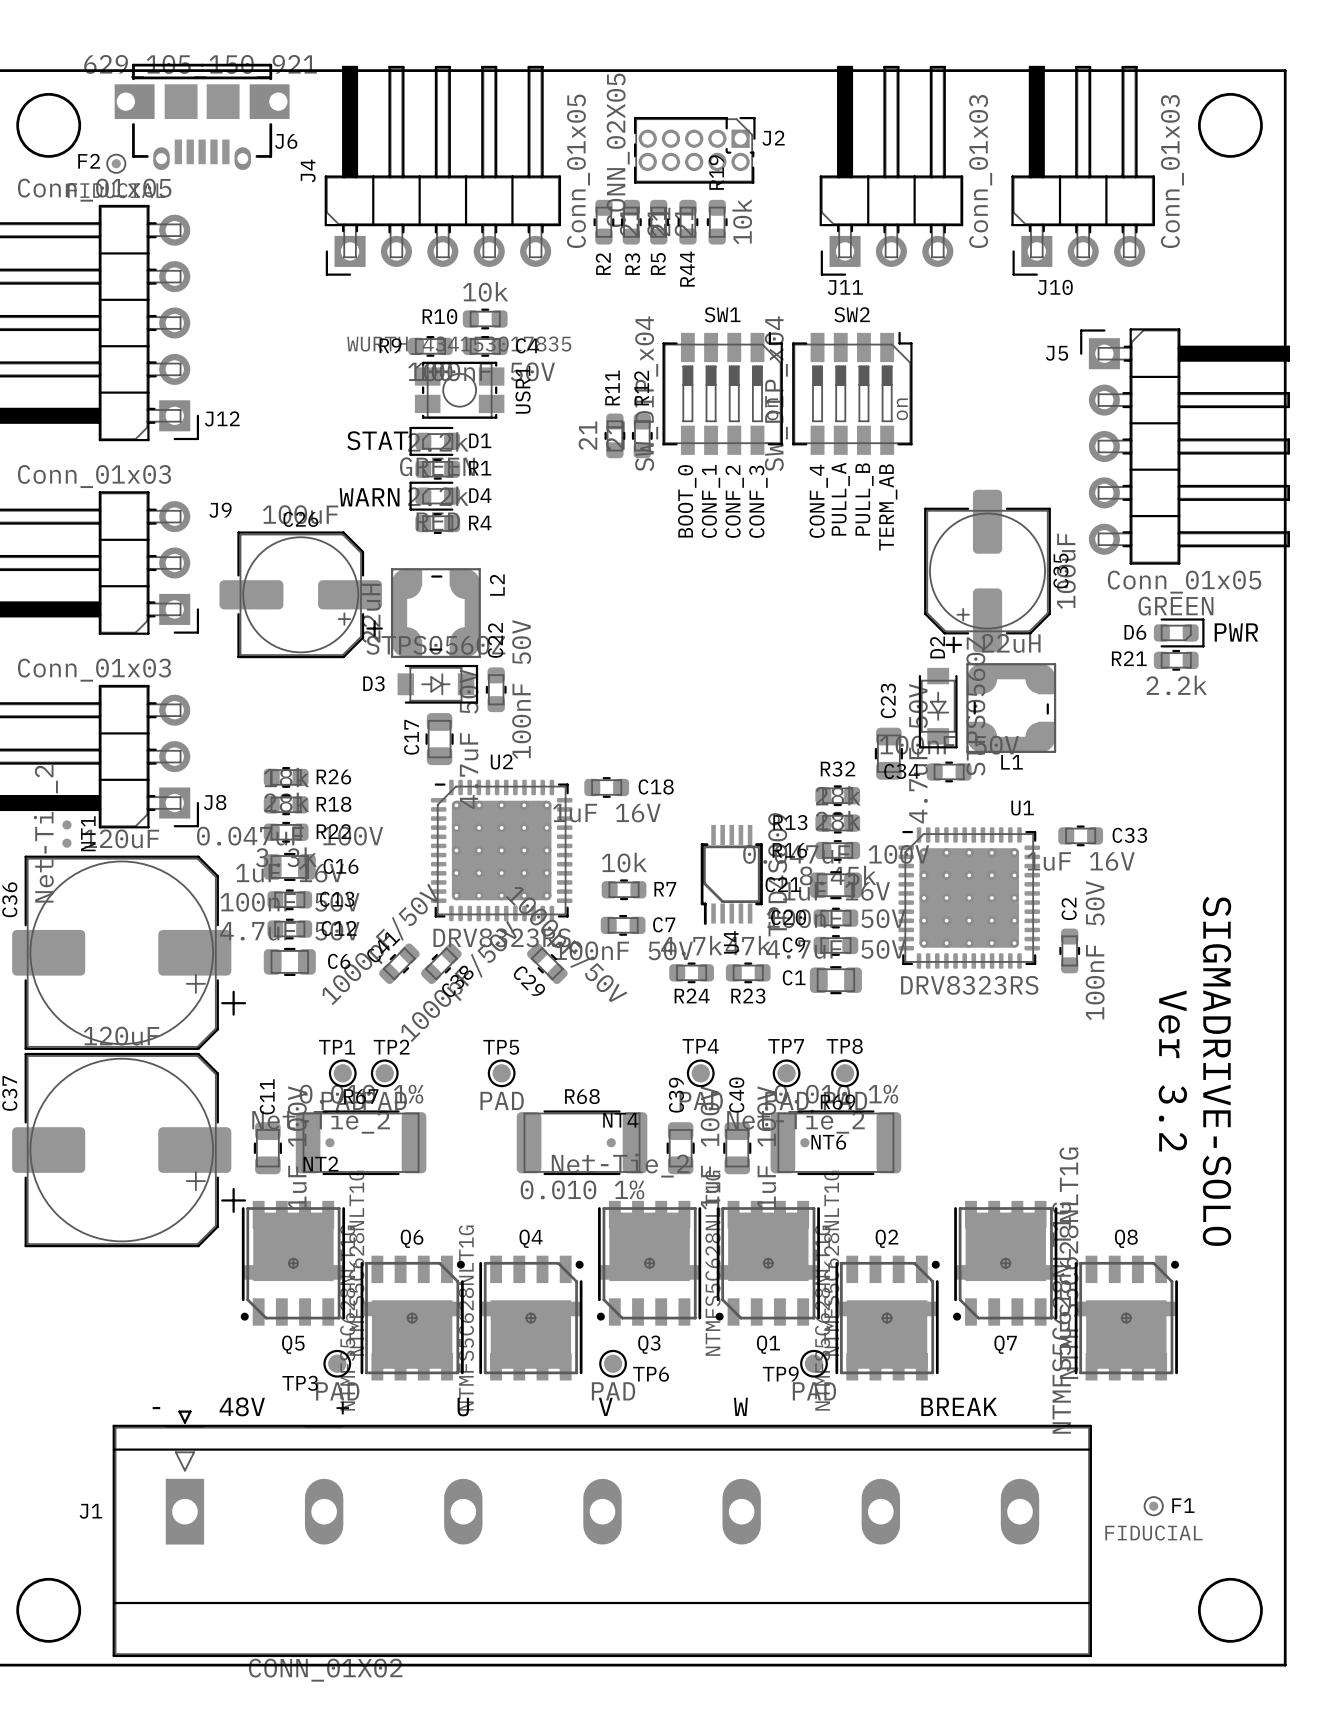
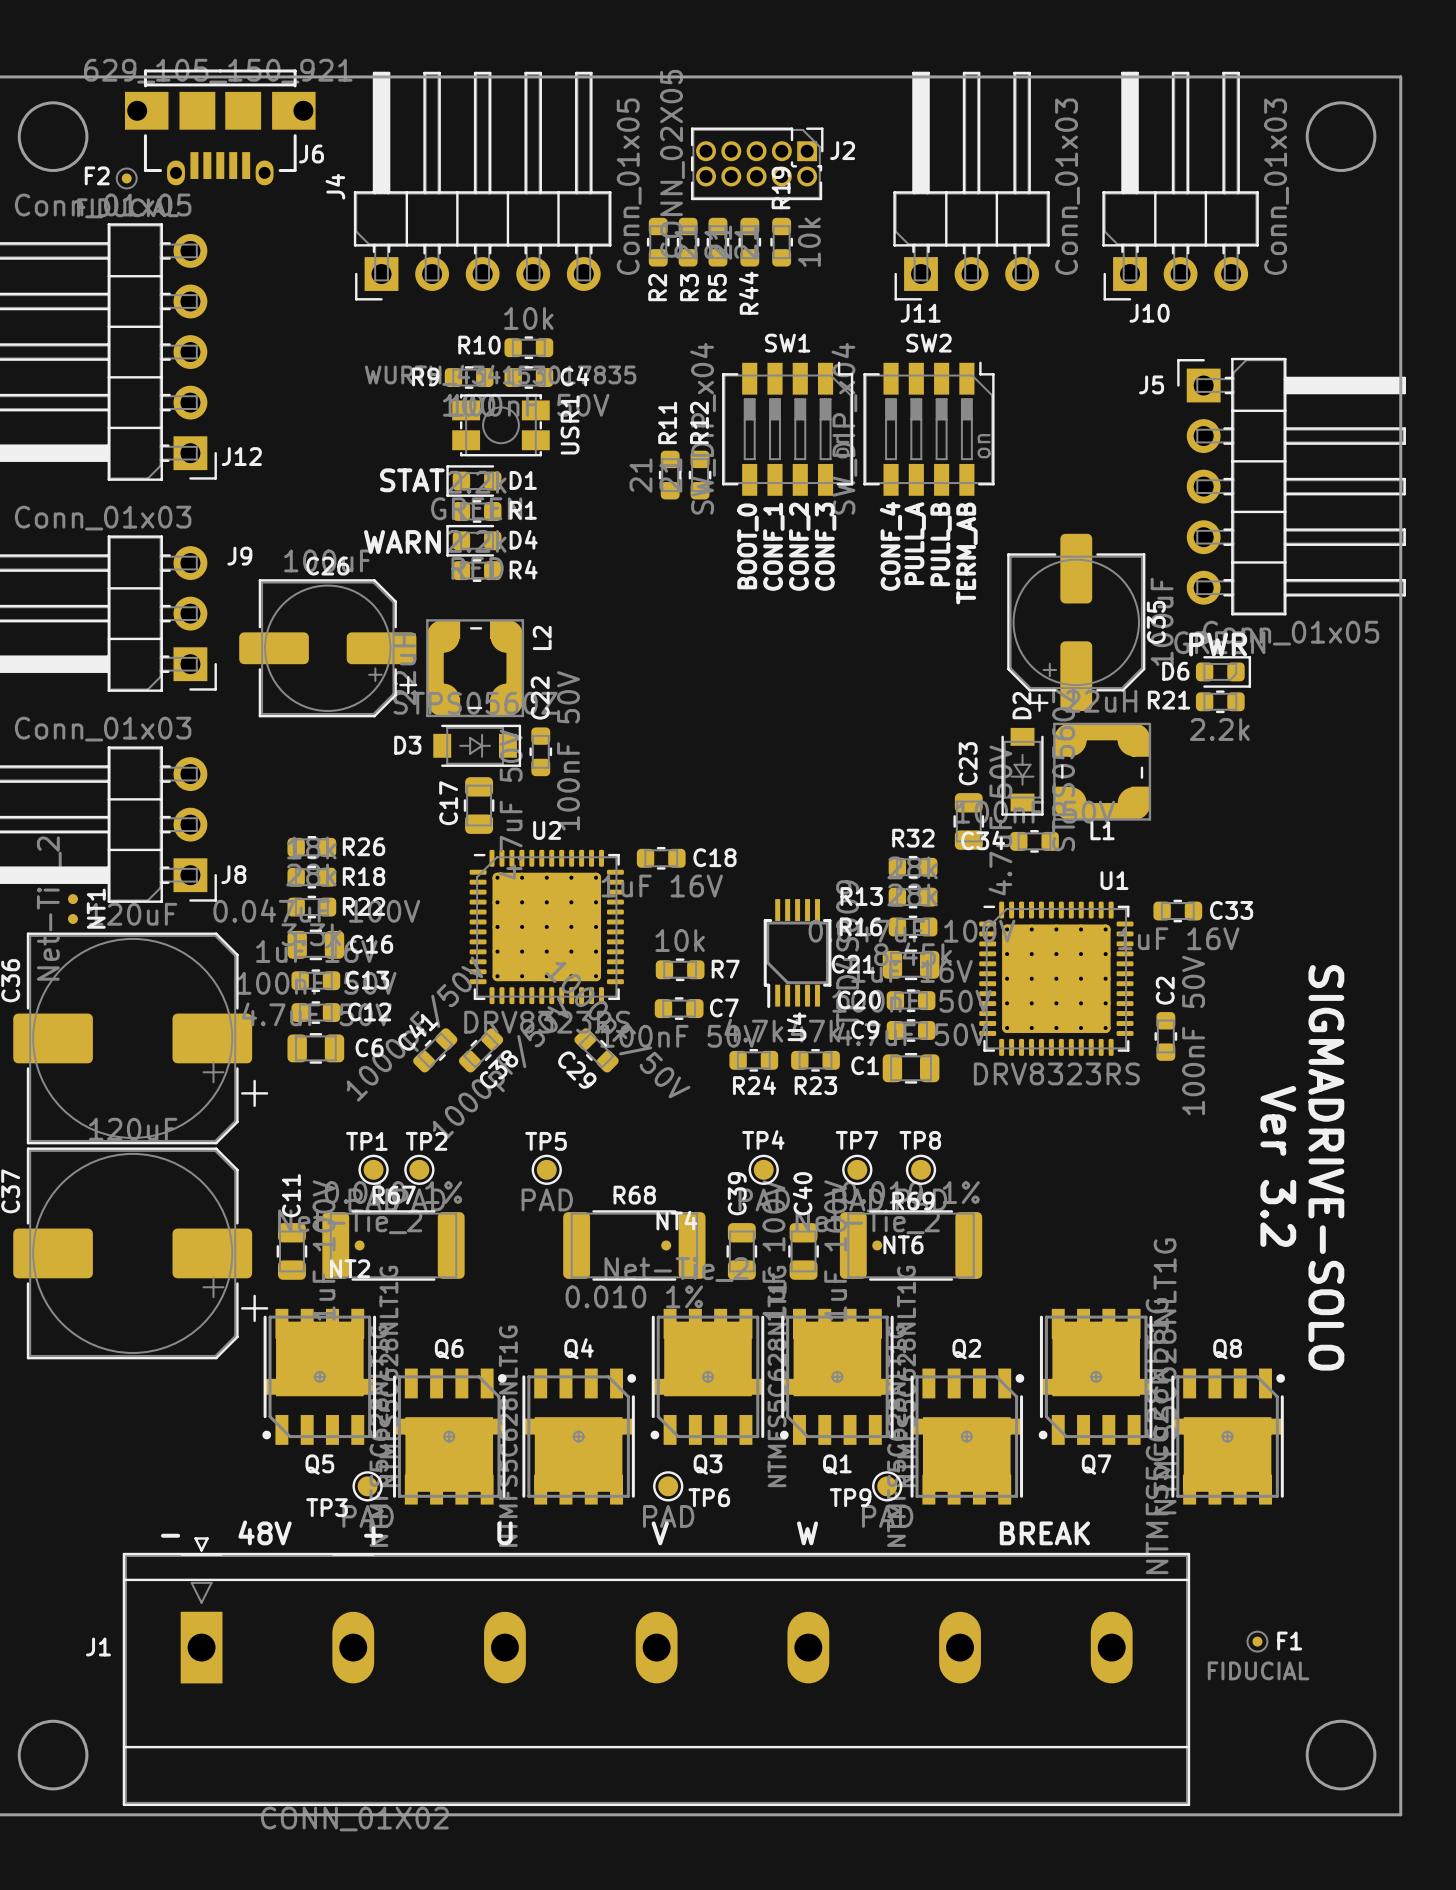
D6 position: (1179, 632) -> (1223, 671)
text position: PWR (1236, 632) -> PWR (1218, 644)
R21 position: (1176, 660) -> (1220, 701)

